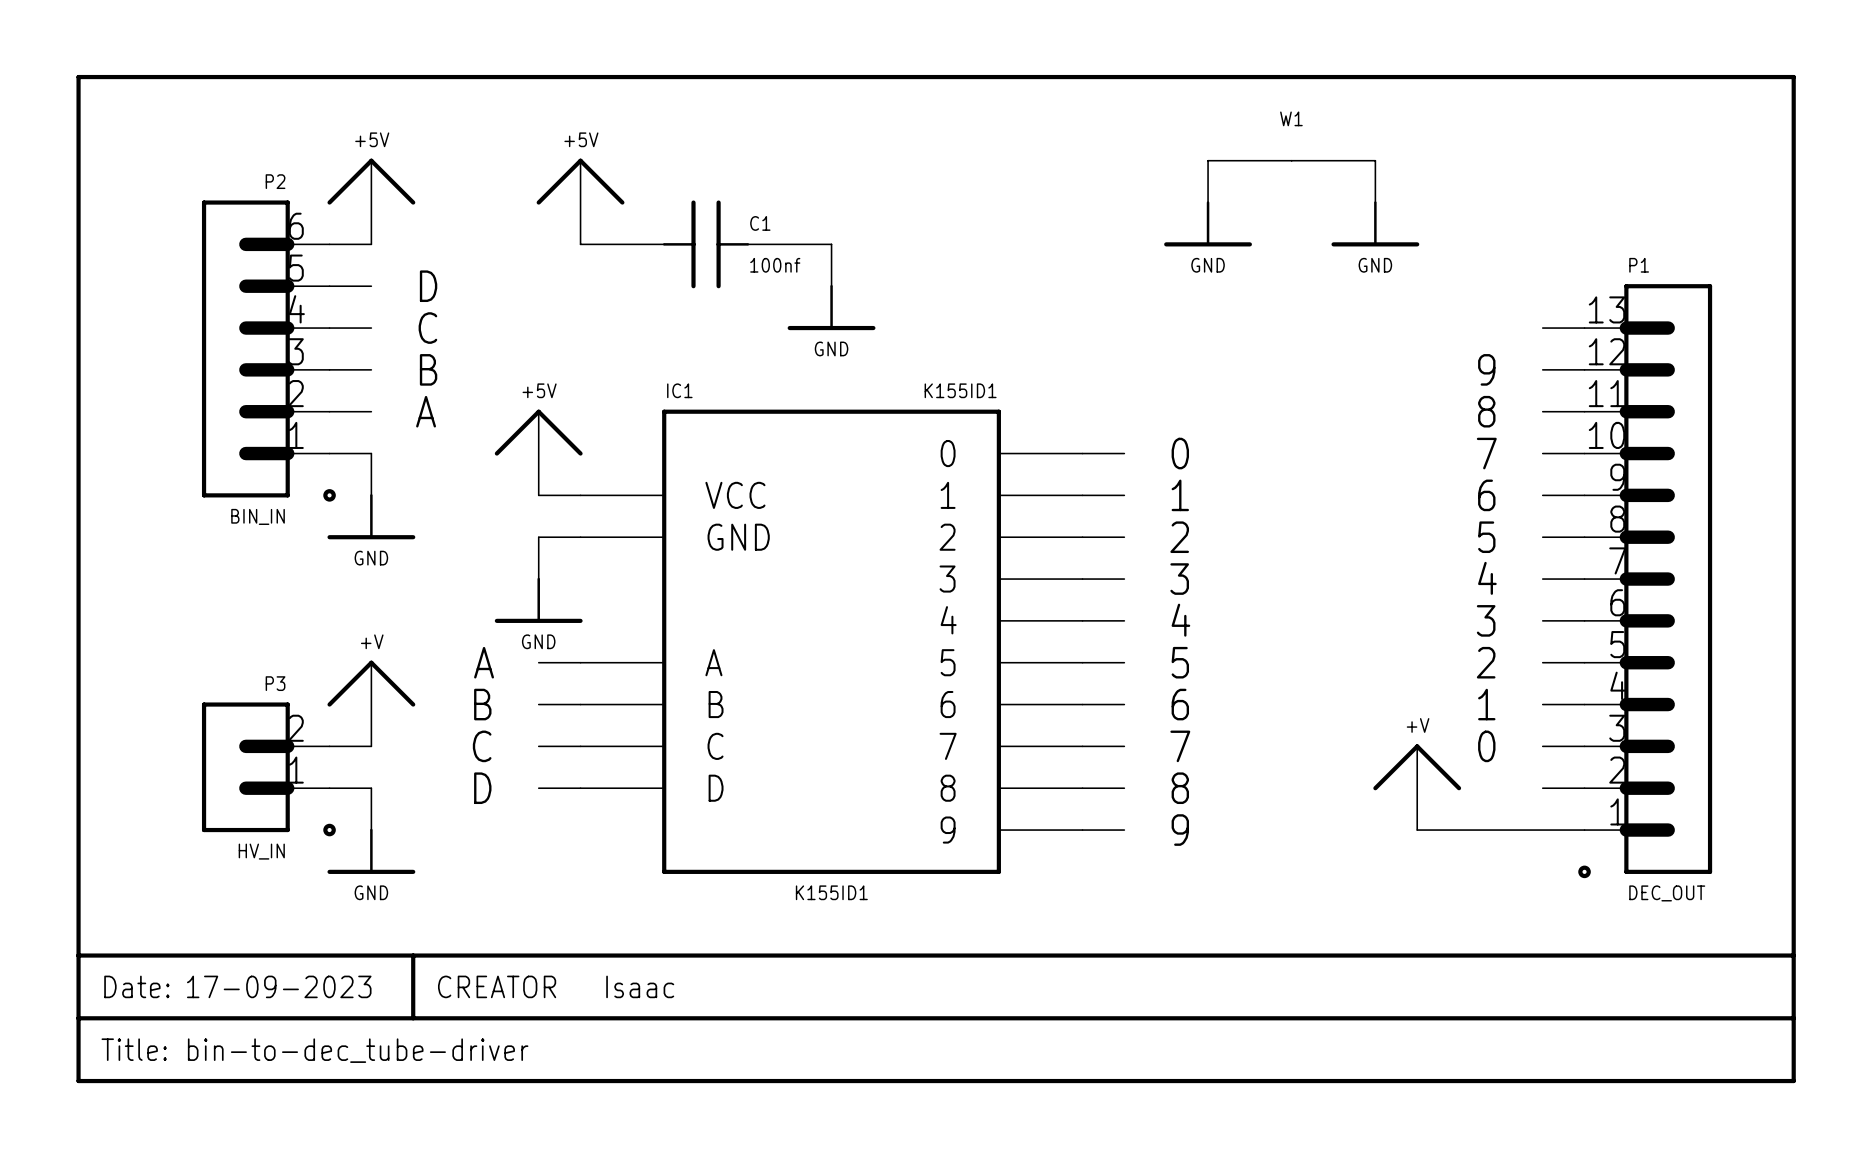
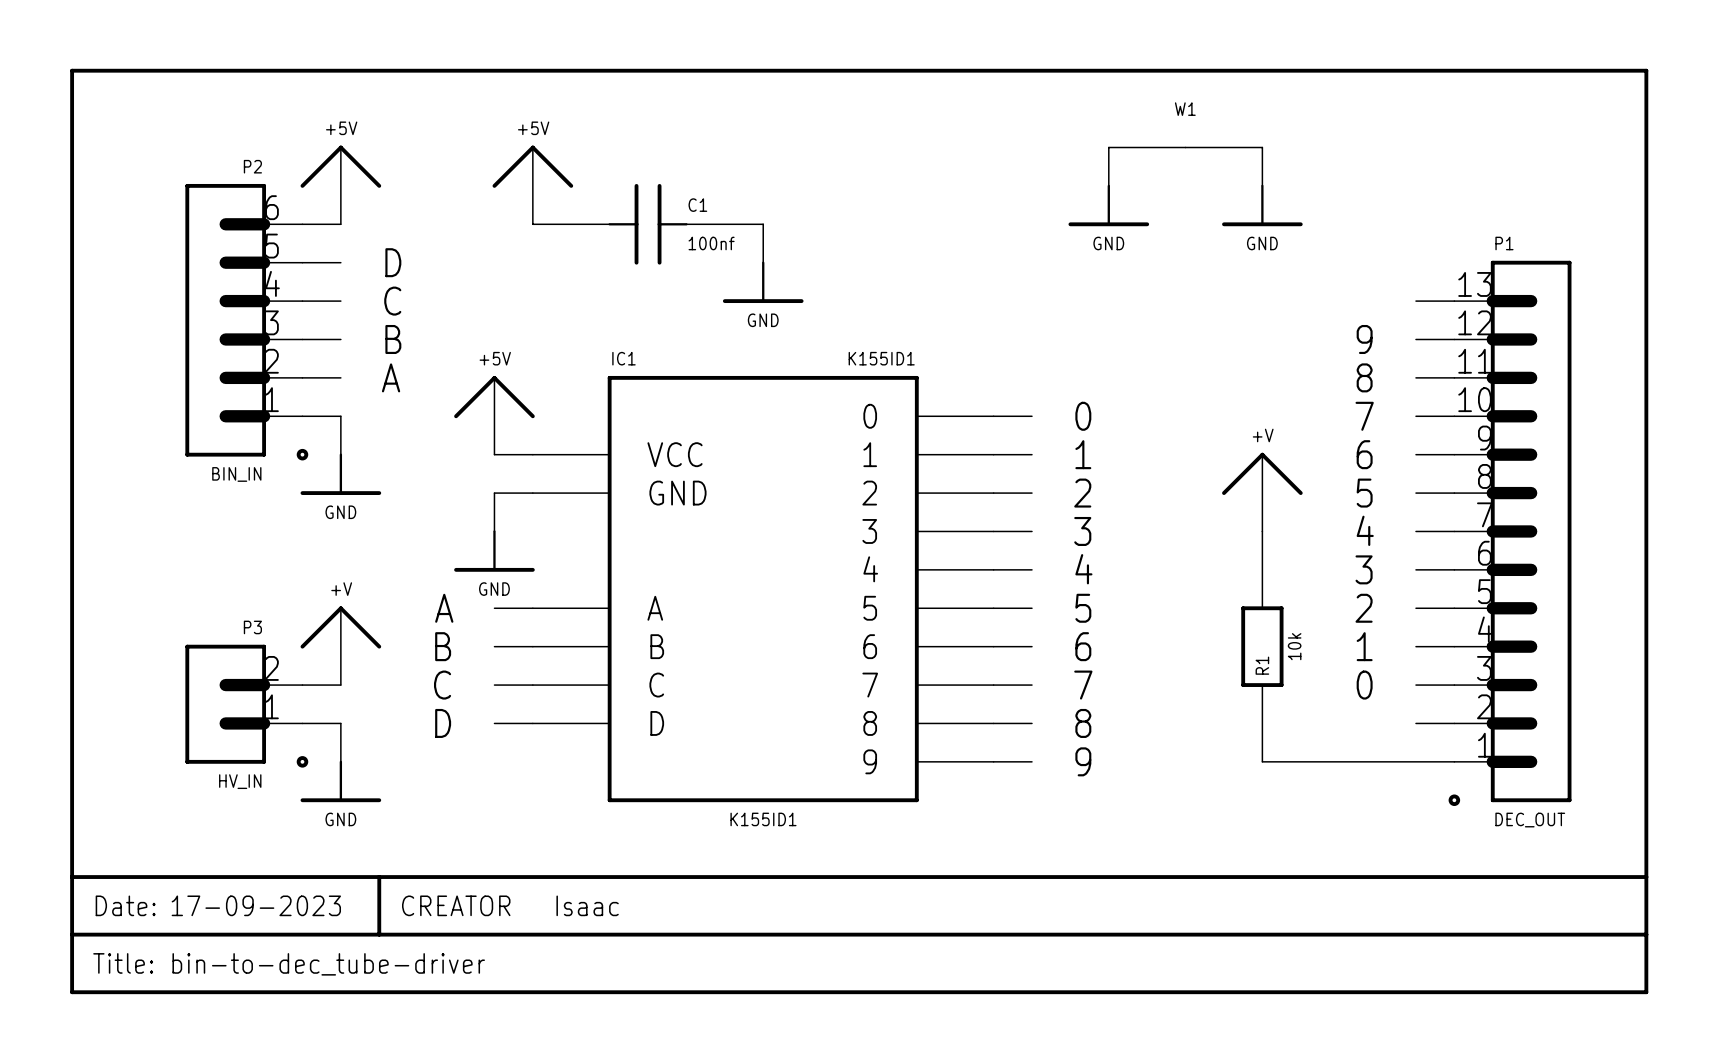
R1: none -> 10k (1262, 646)
power symbol position: (1417, 787) -> (1262, 492)
wire: none -> (1262, 761) (1300, 761)

